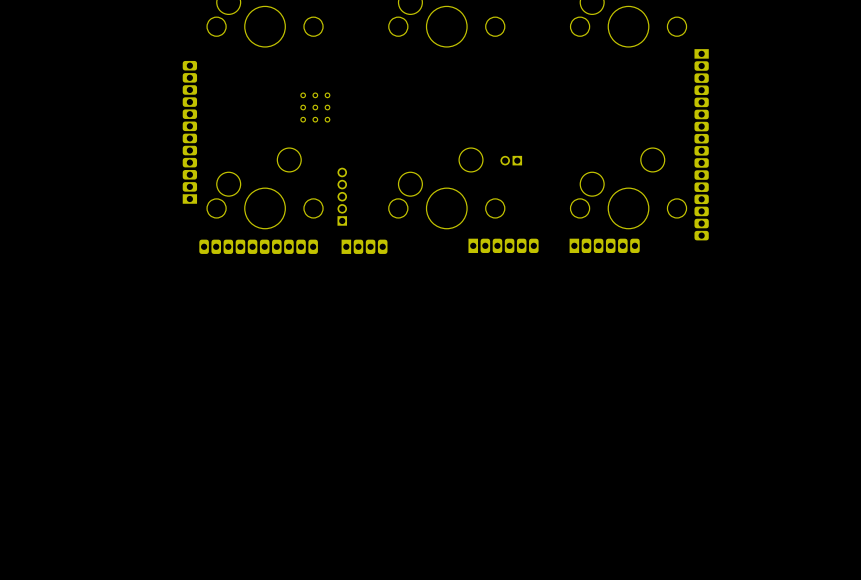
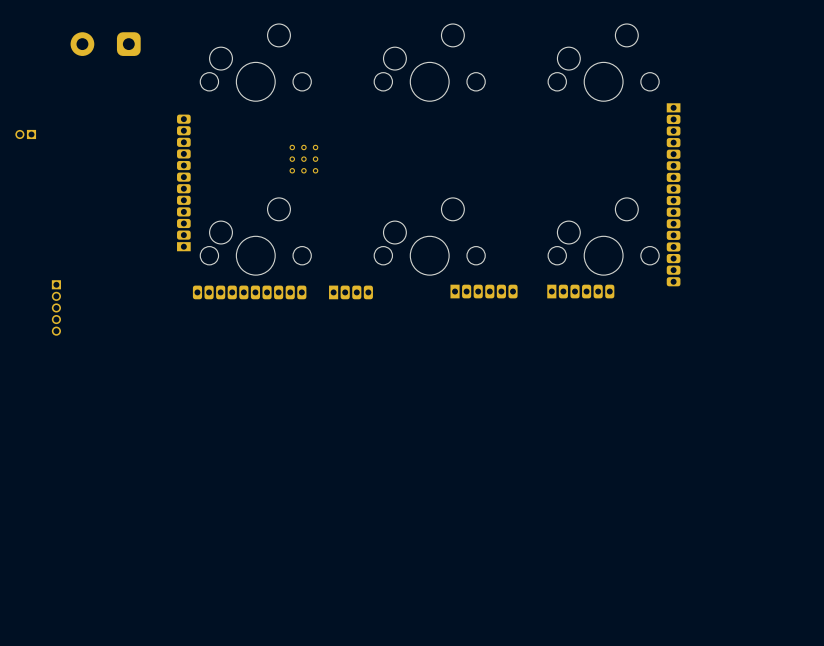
part: none -> (25, 134)
part: (511, 160) -> none
part: (342, 196) -> none
part: none -> (56, 307)

